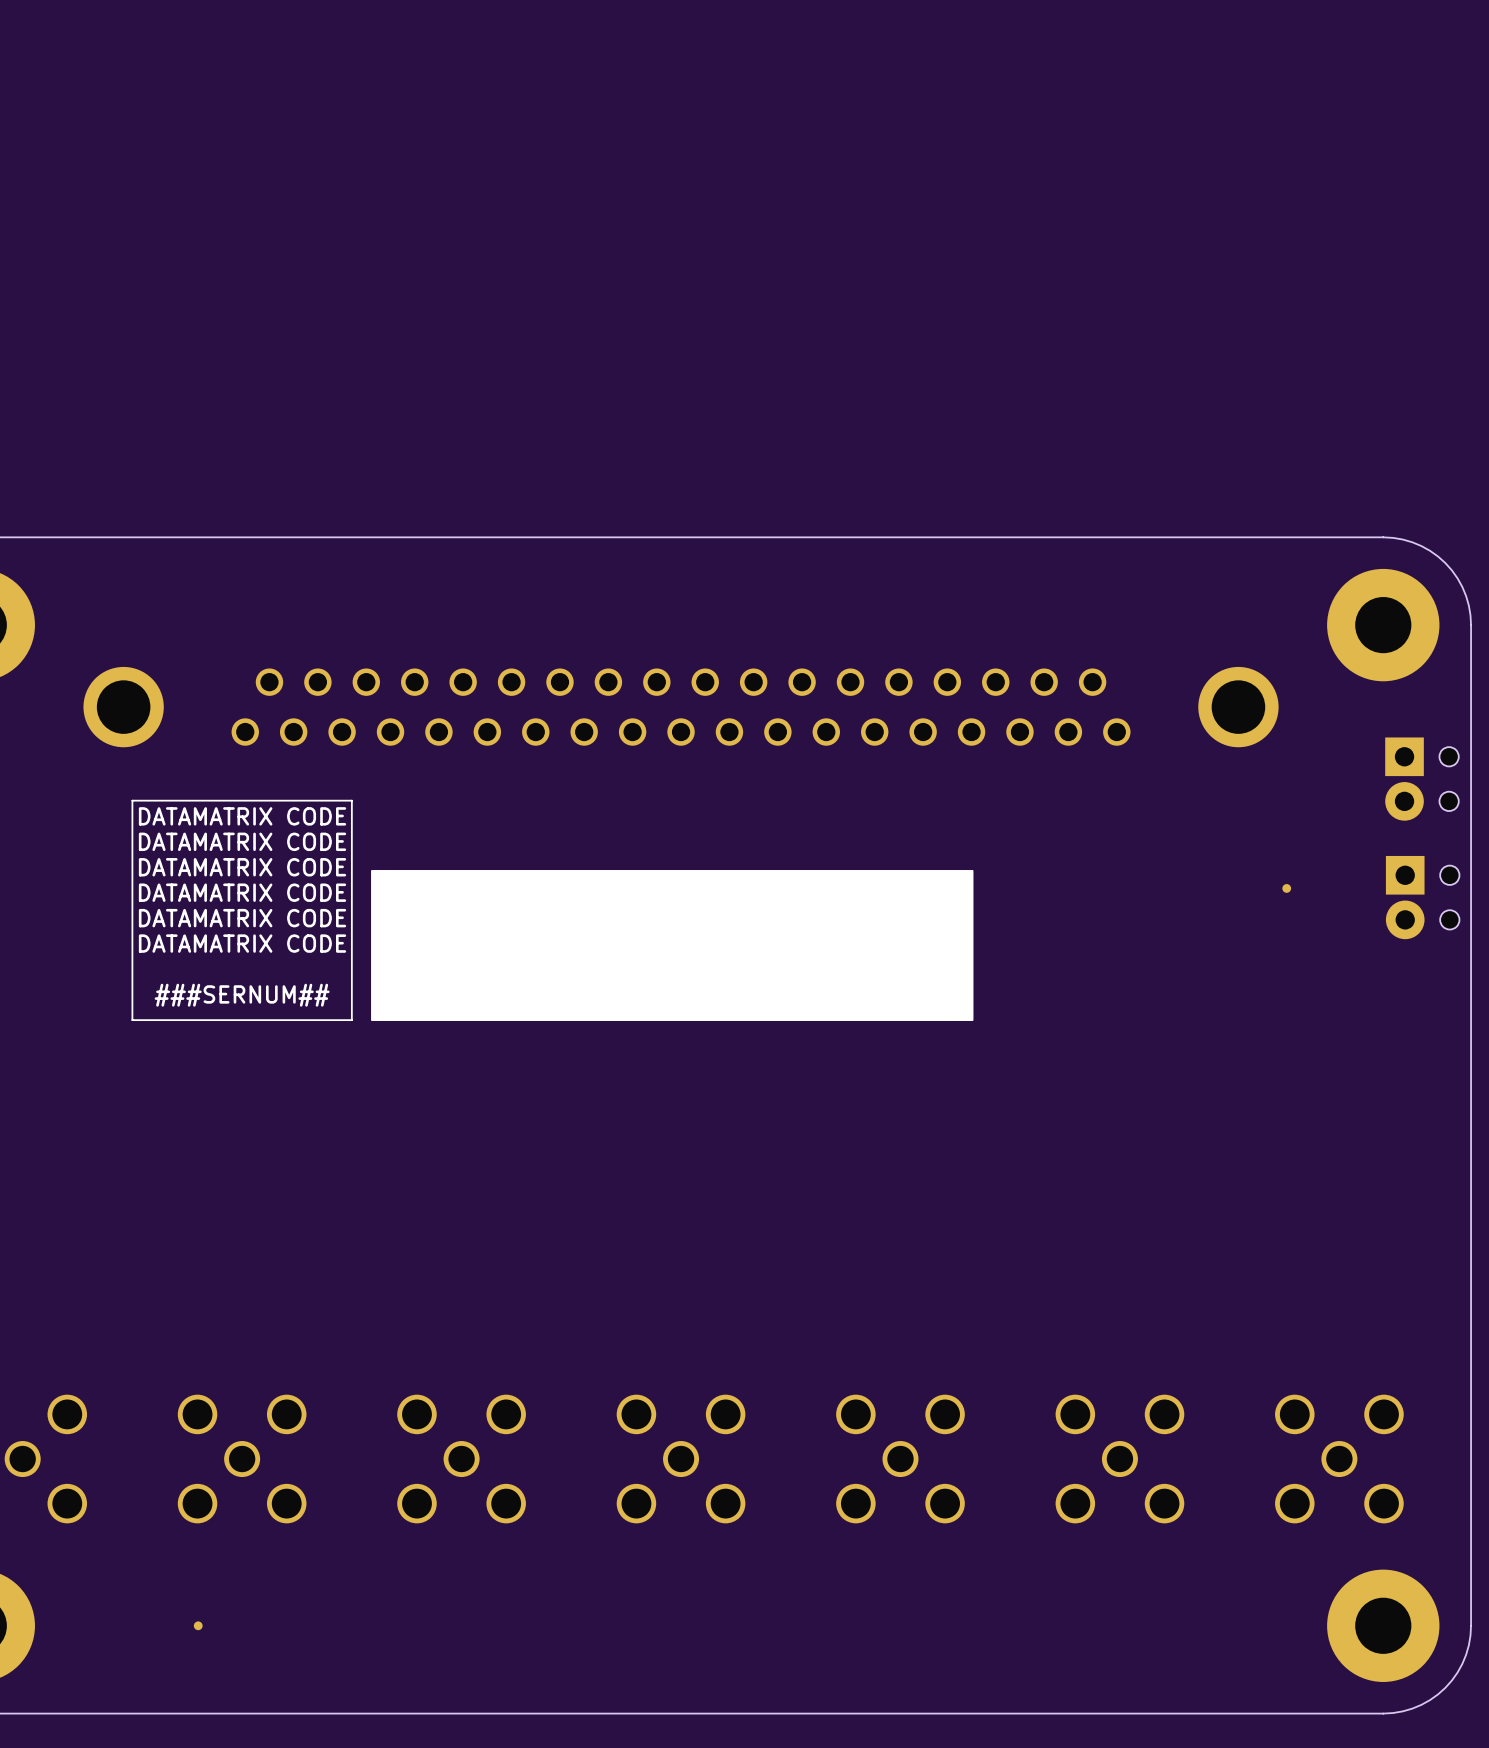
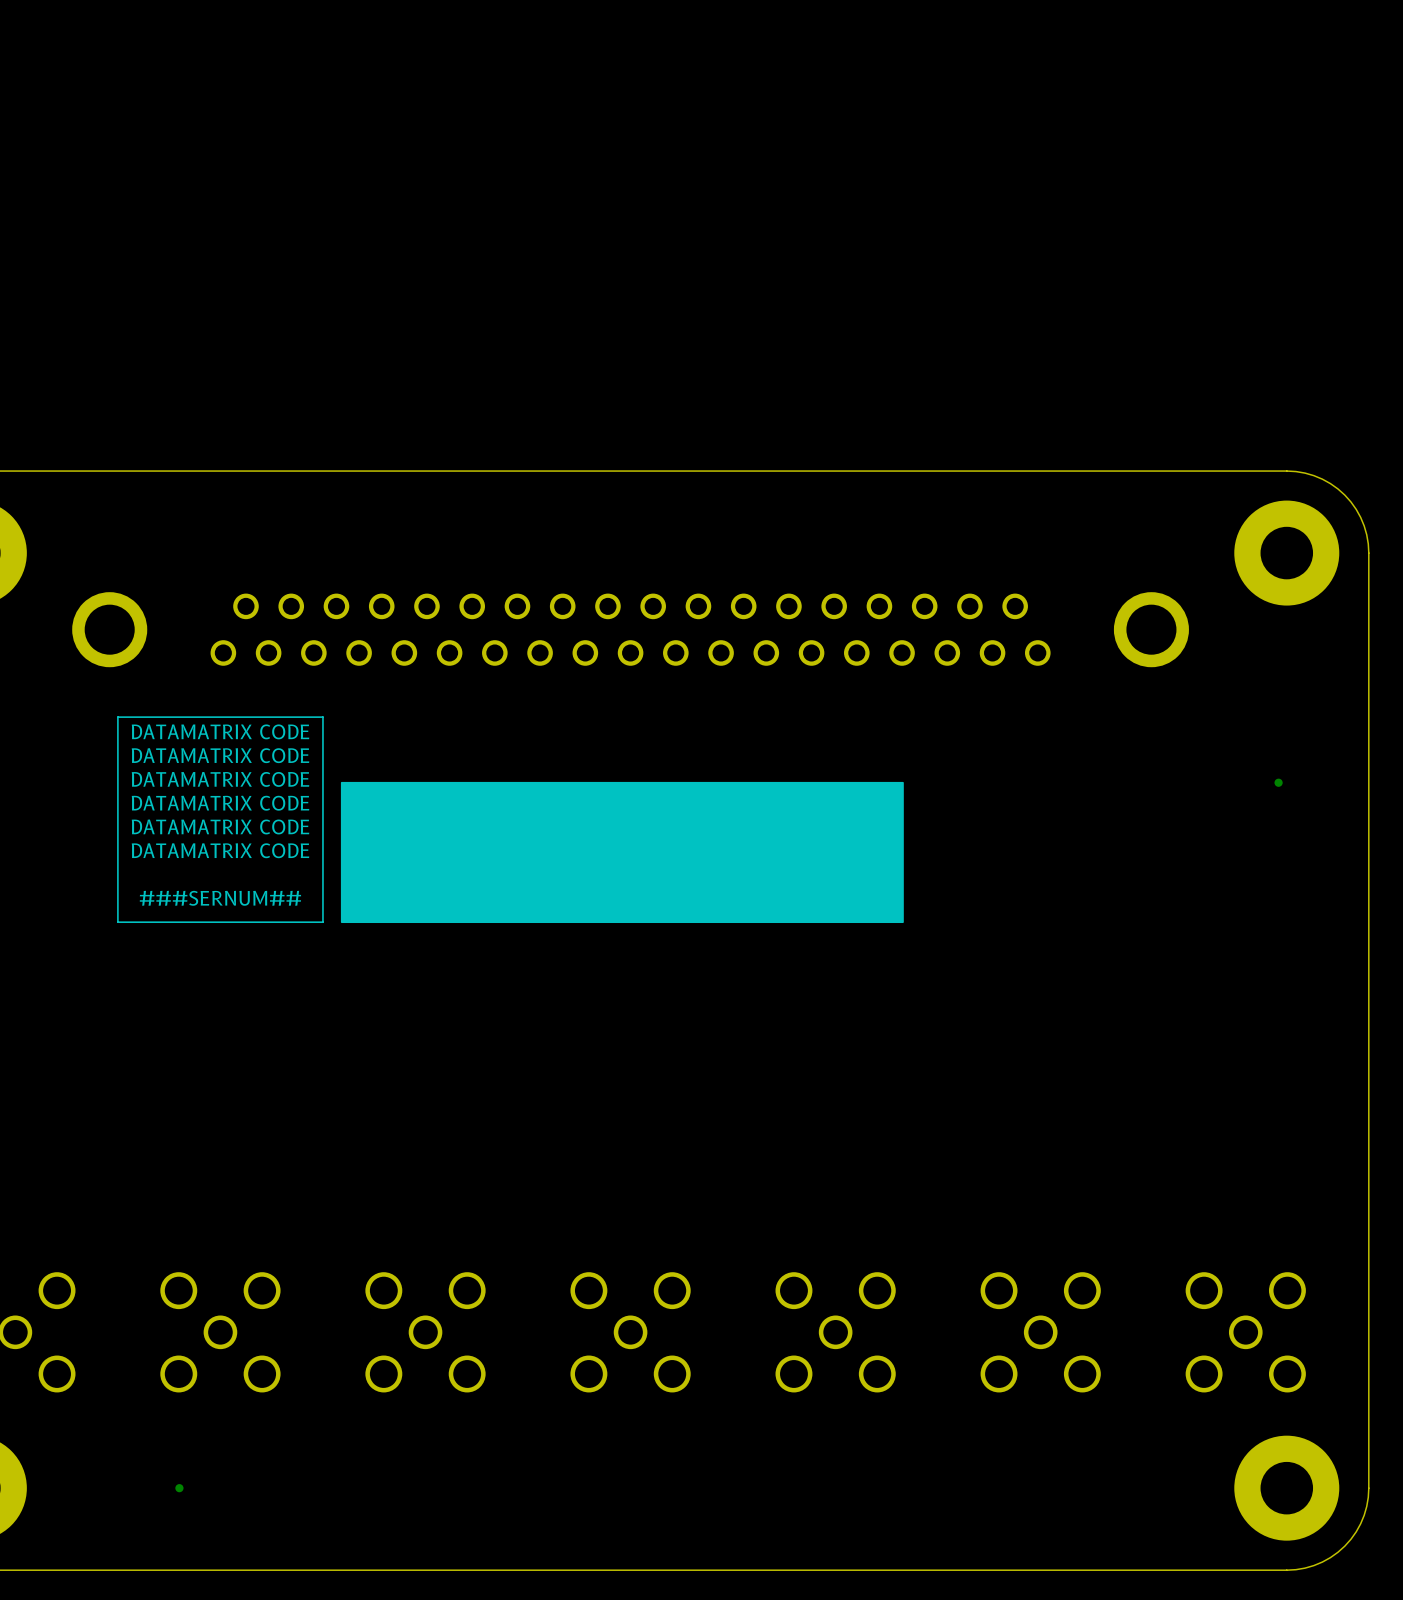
part: (1421, 779) -> none
part position: (1286, 888) -> (1278, 782)
part: (1422, 897) -> none

